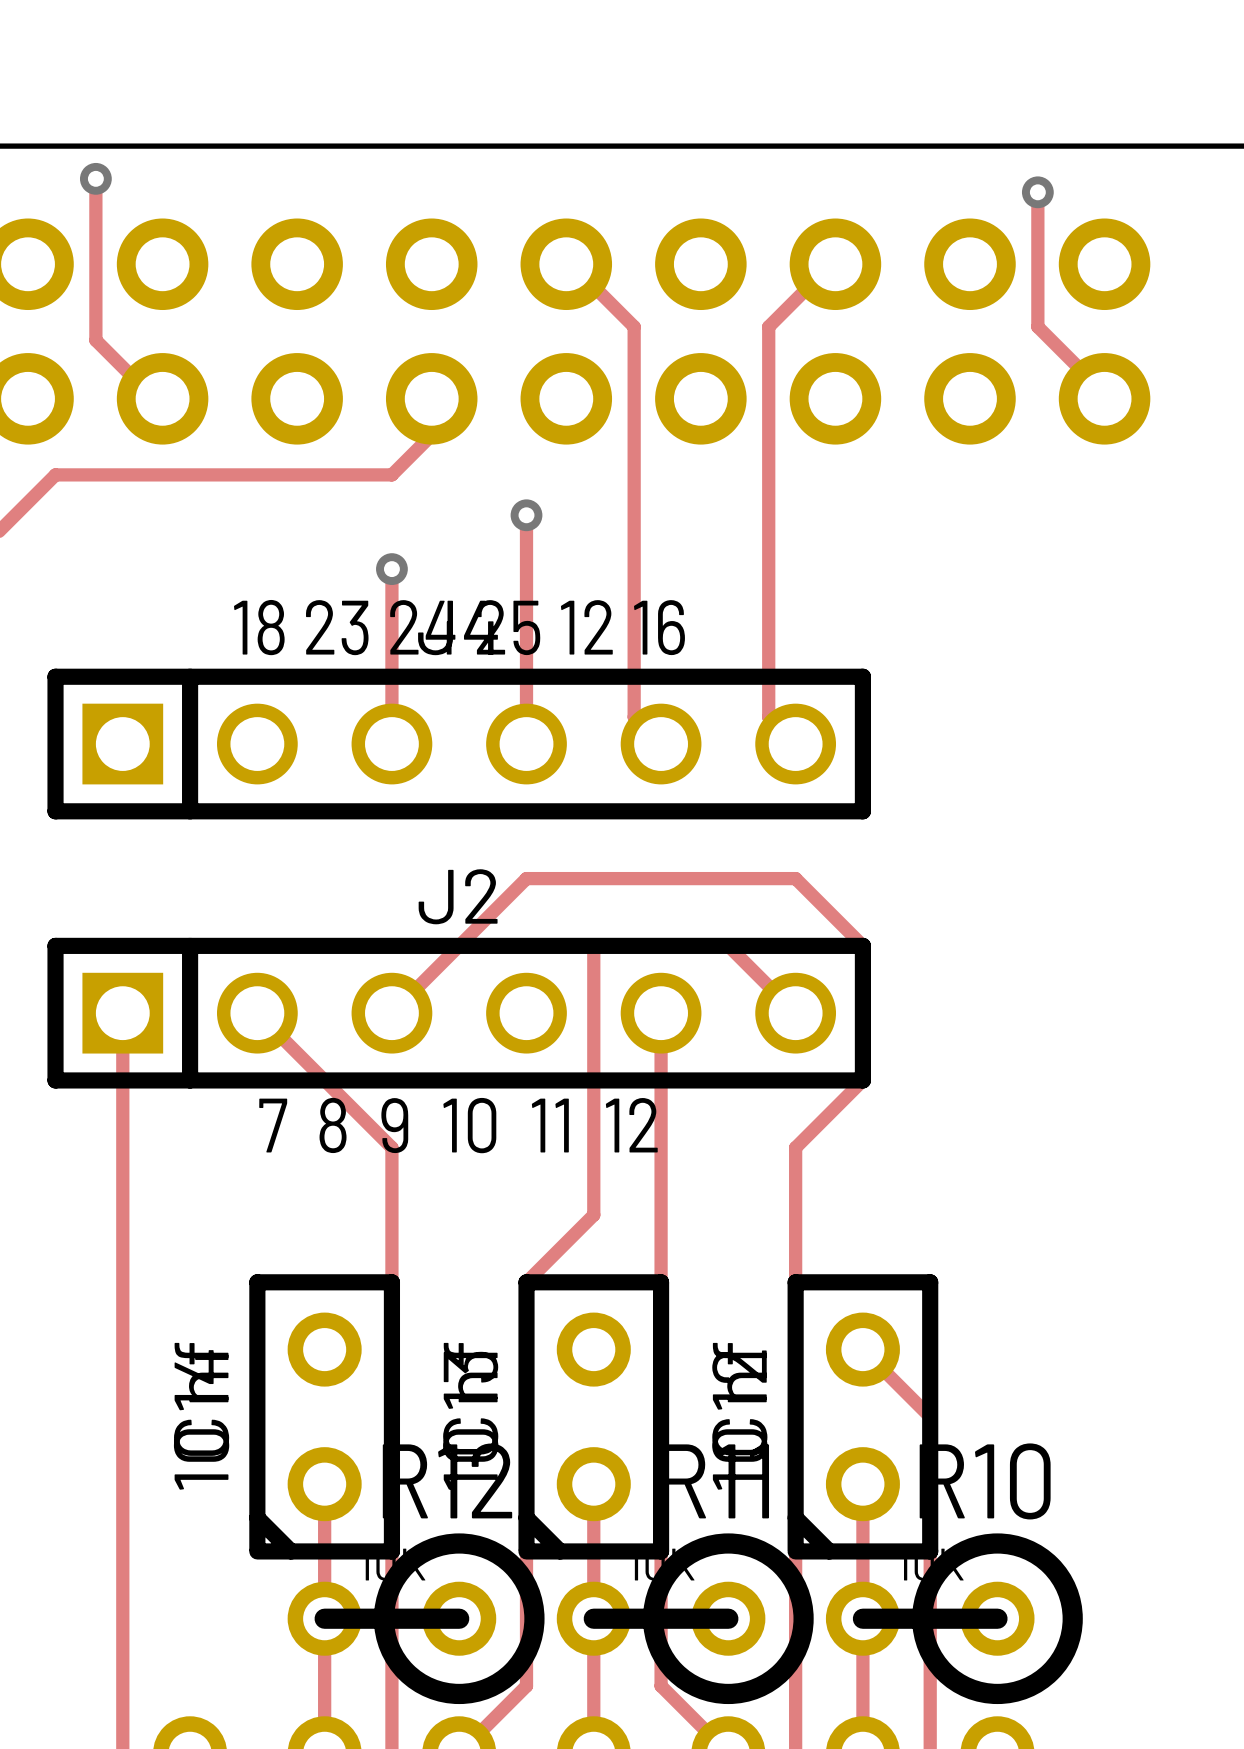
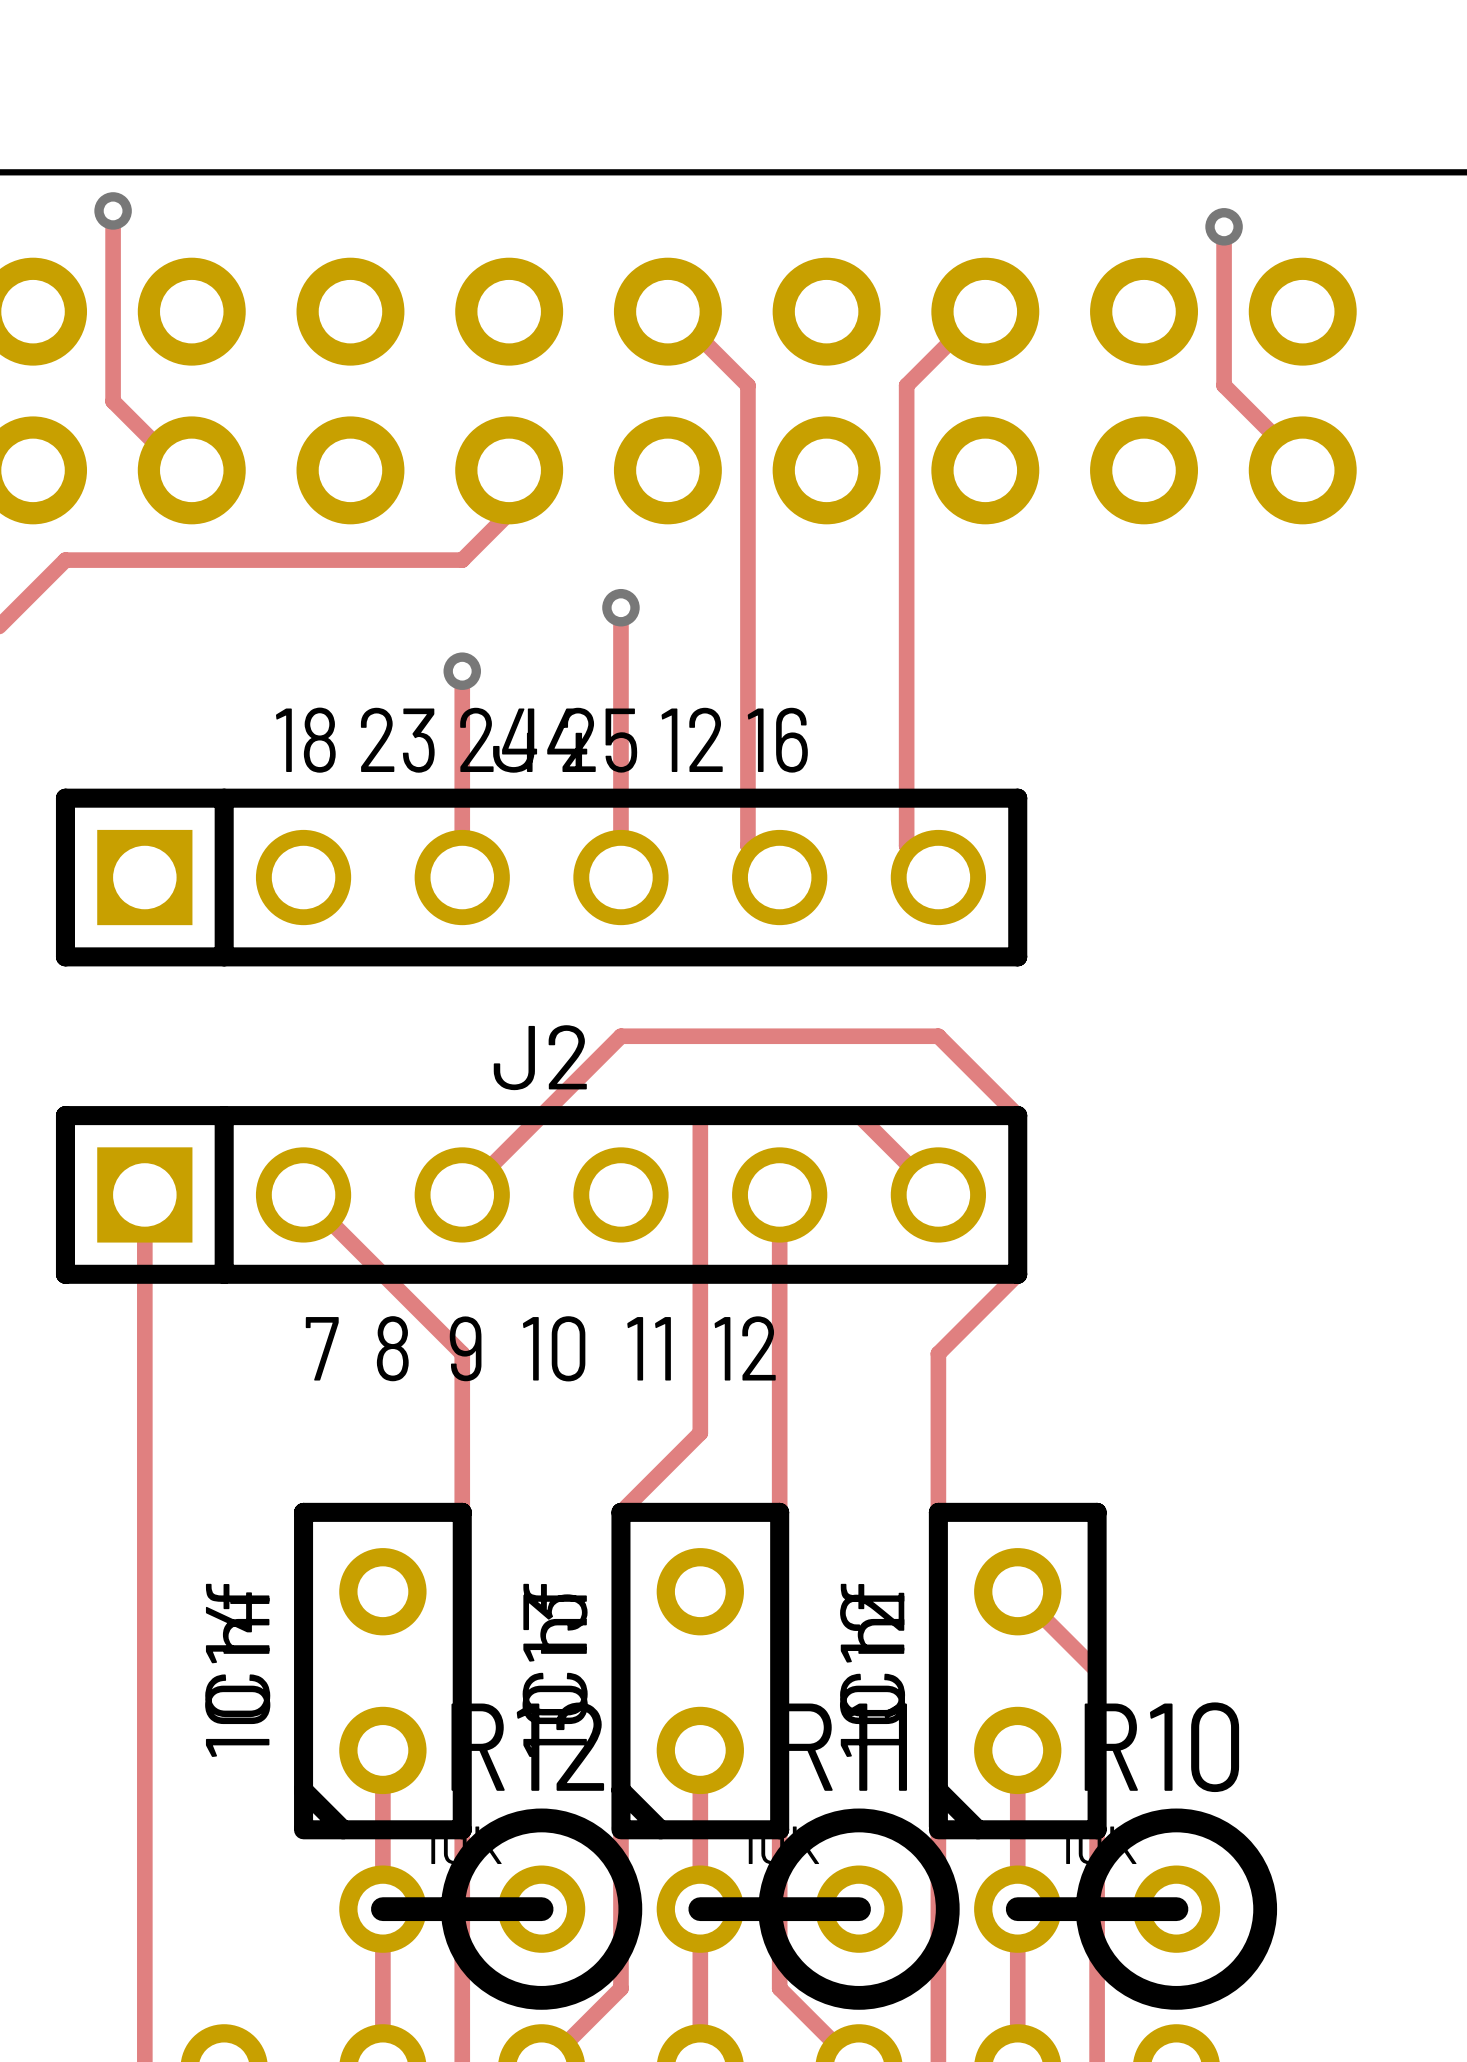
J2 value position: 7 8 9 10 11 12 (458, 1125) -> 7 8 9 10 11 12 (540, 1348)

